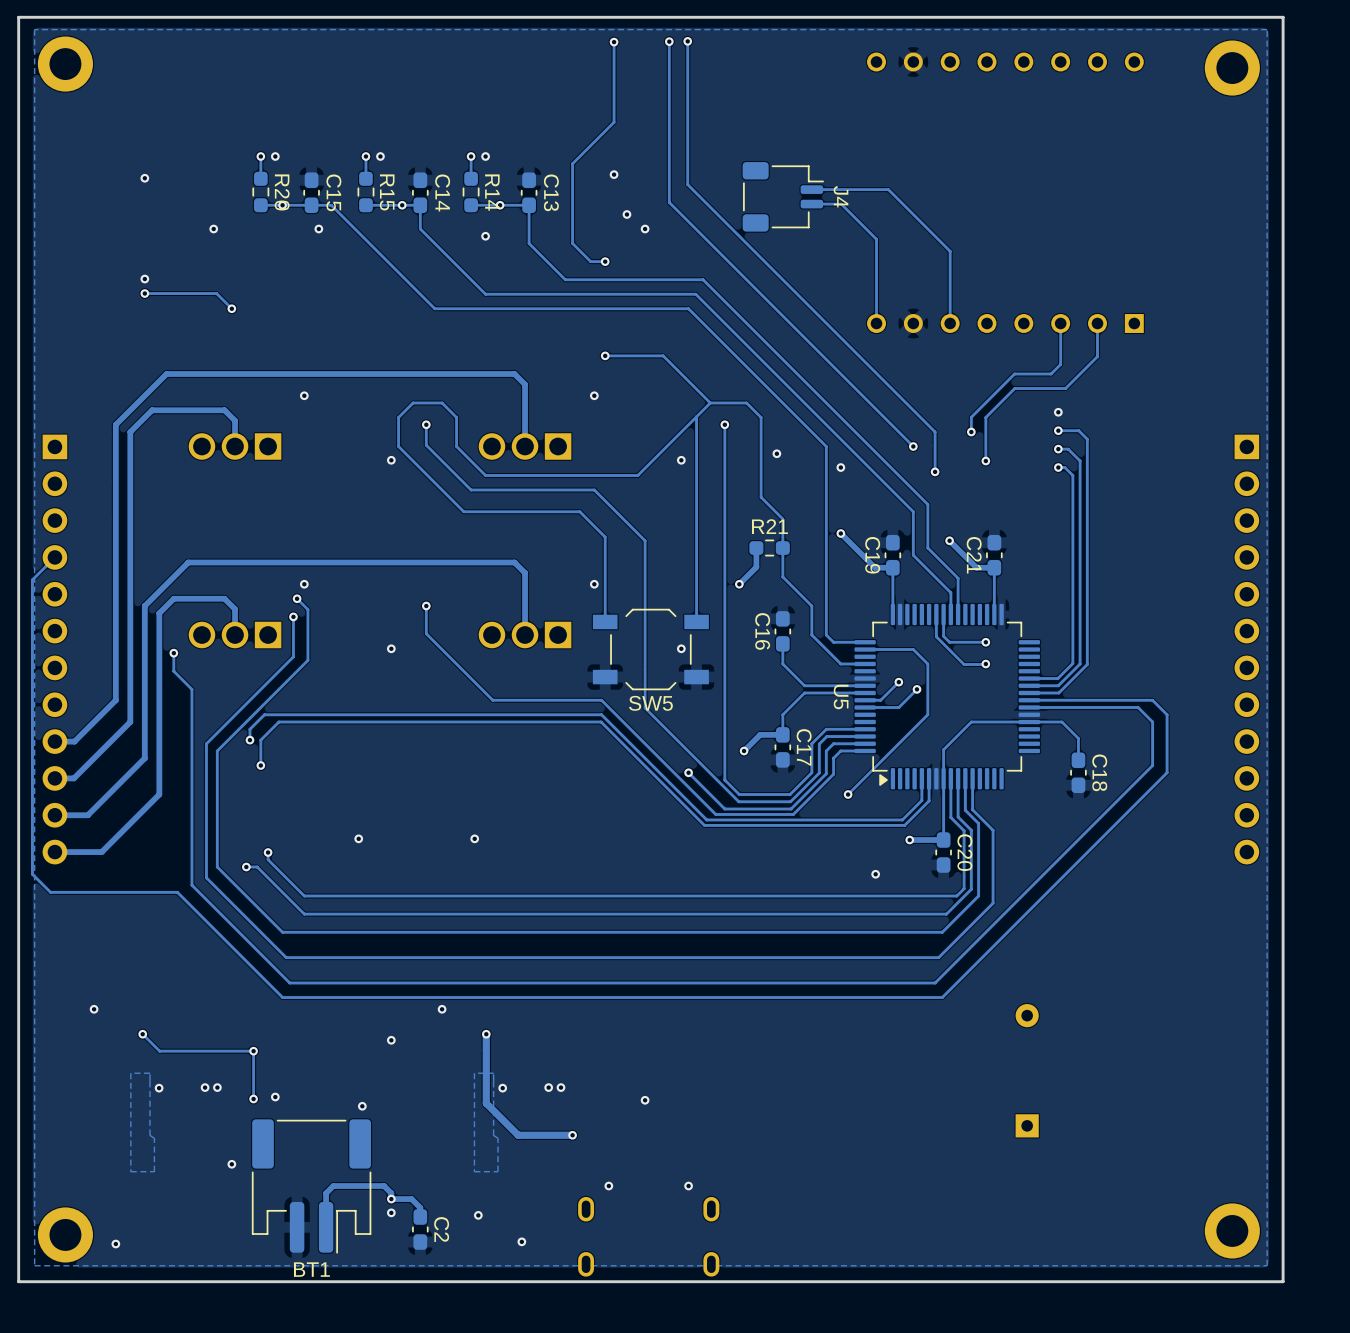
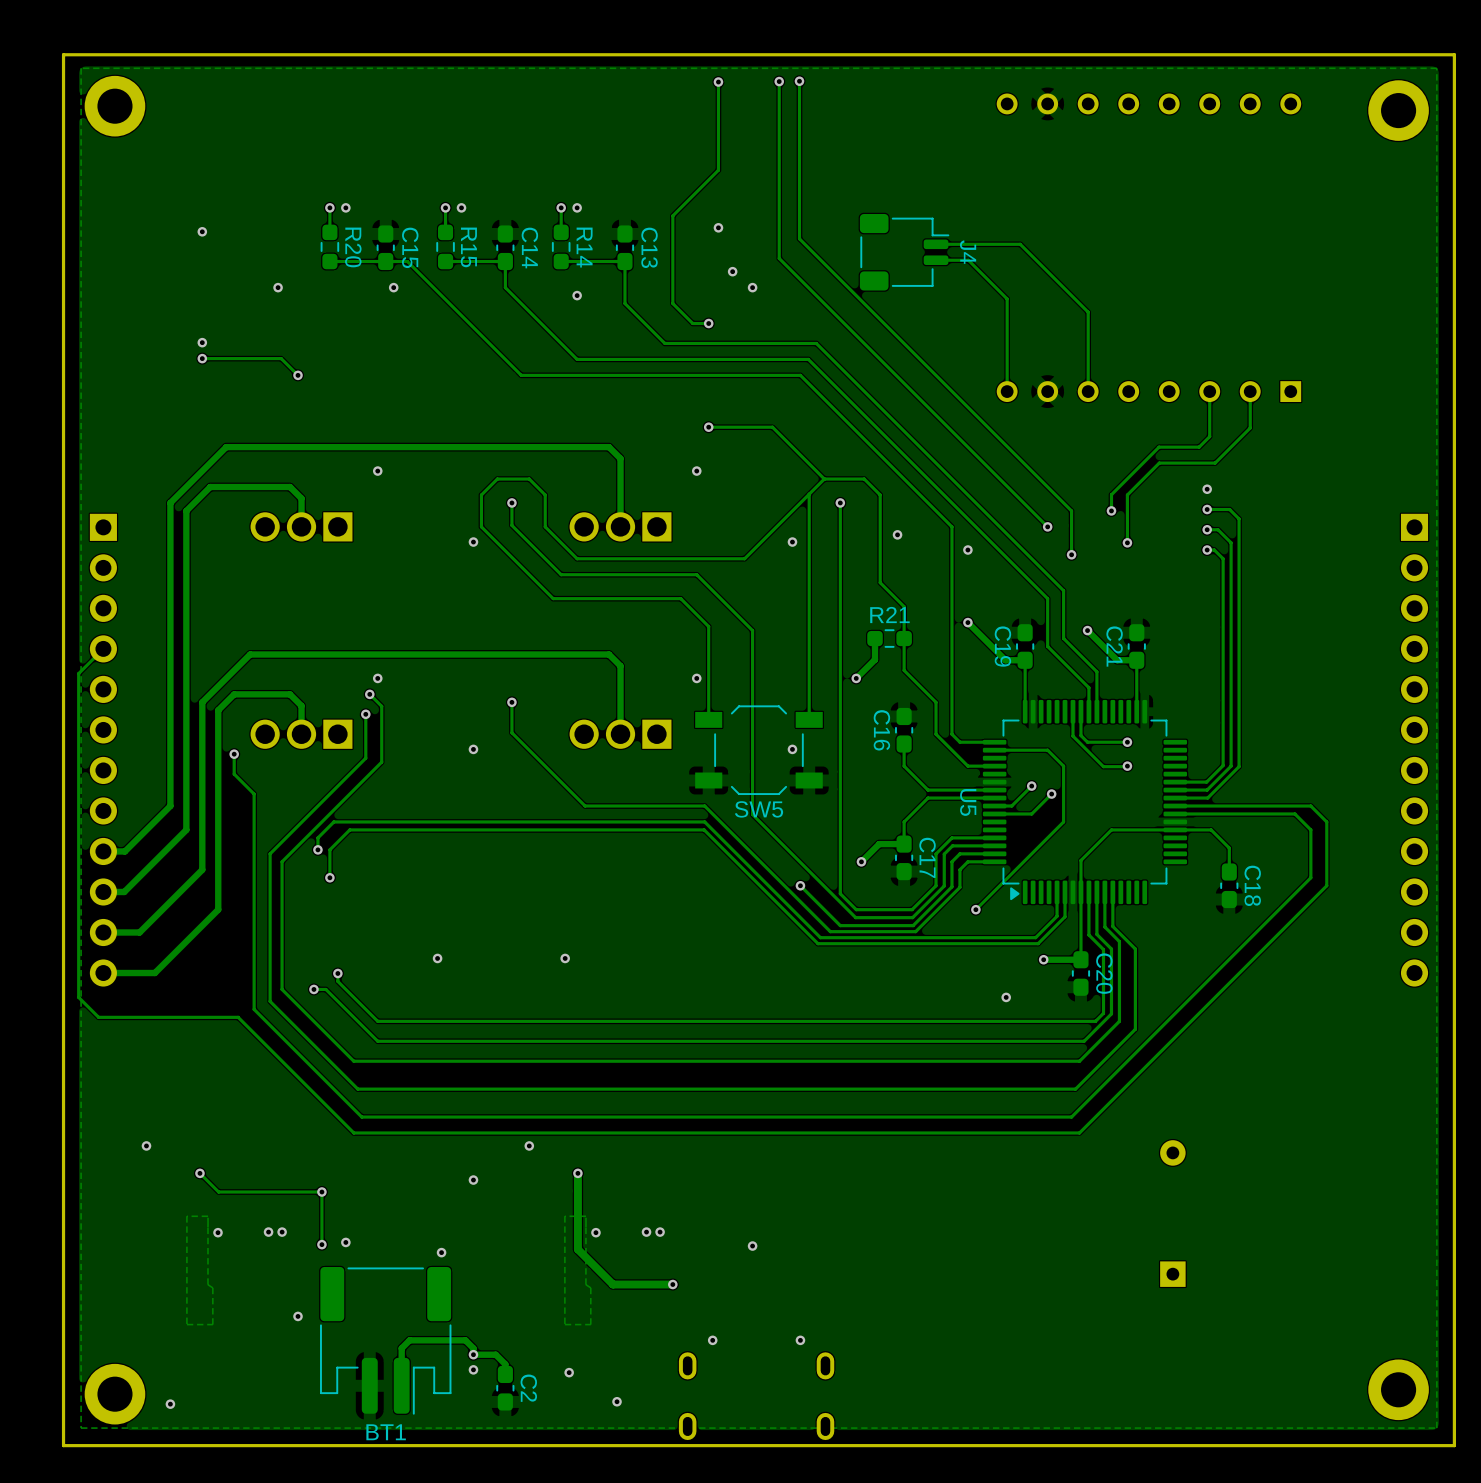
via: (282, 205) -> none
via: (402, 205) -> none
via: (500, 205) -> none

